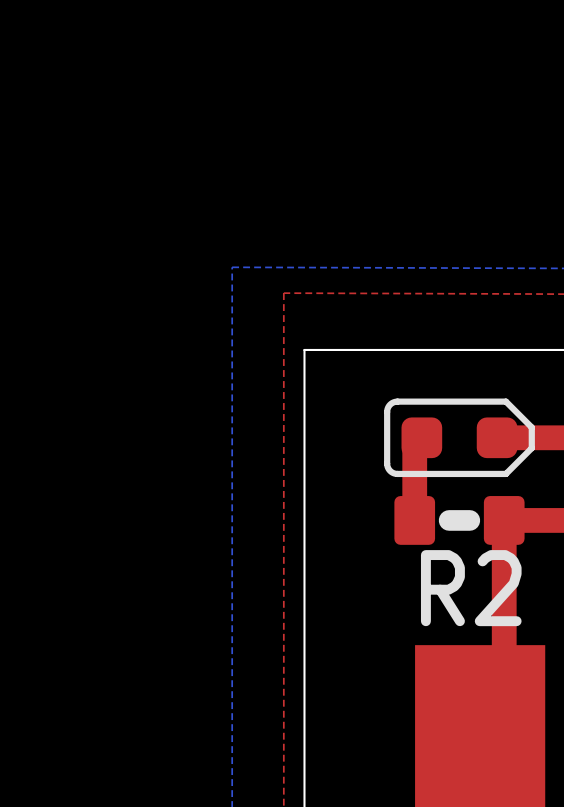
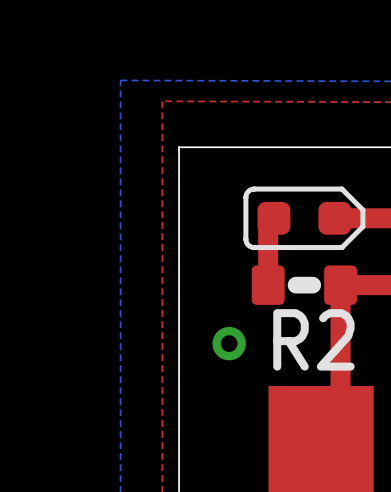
via: none -> (229, 343)

